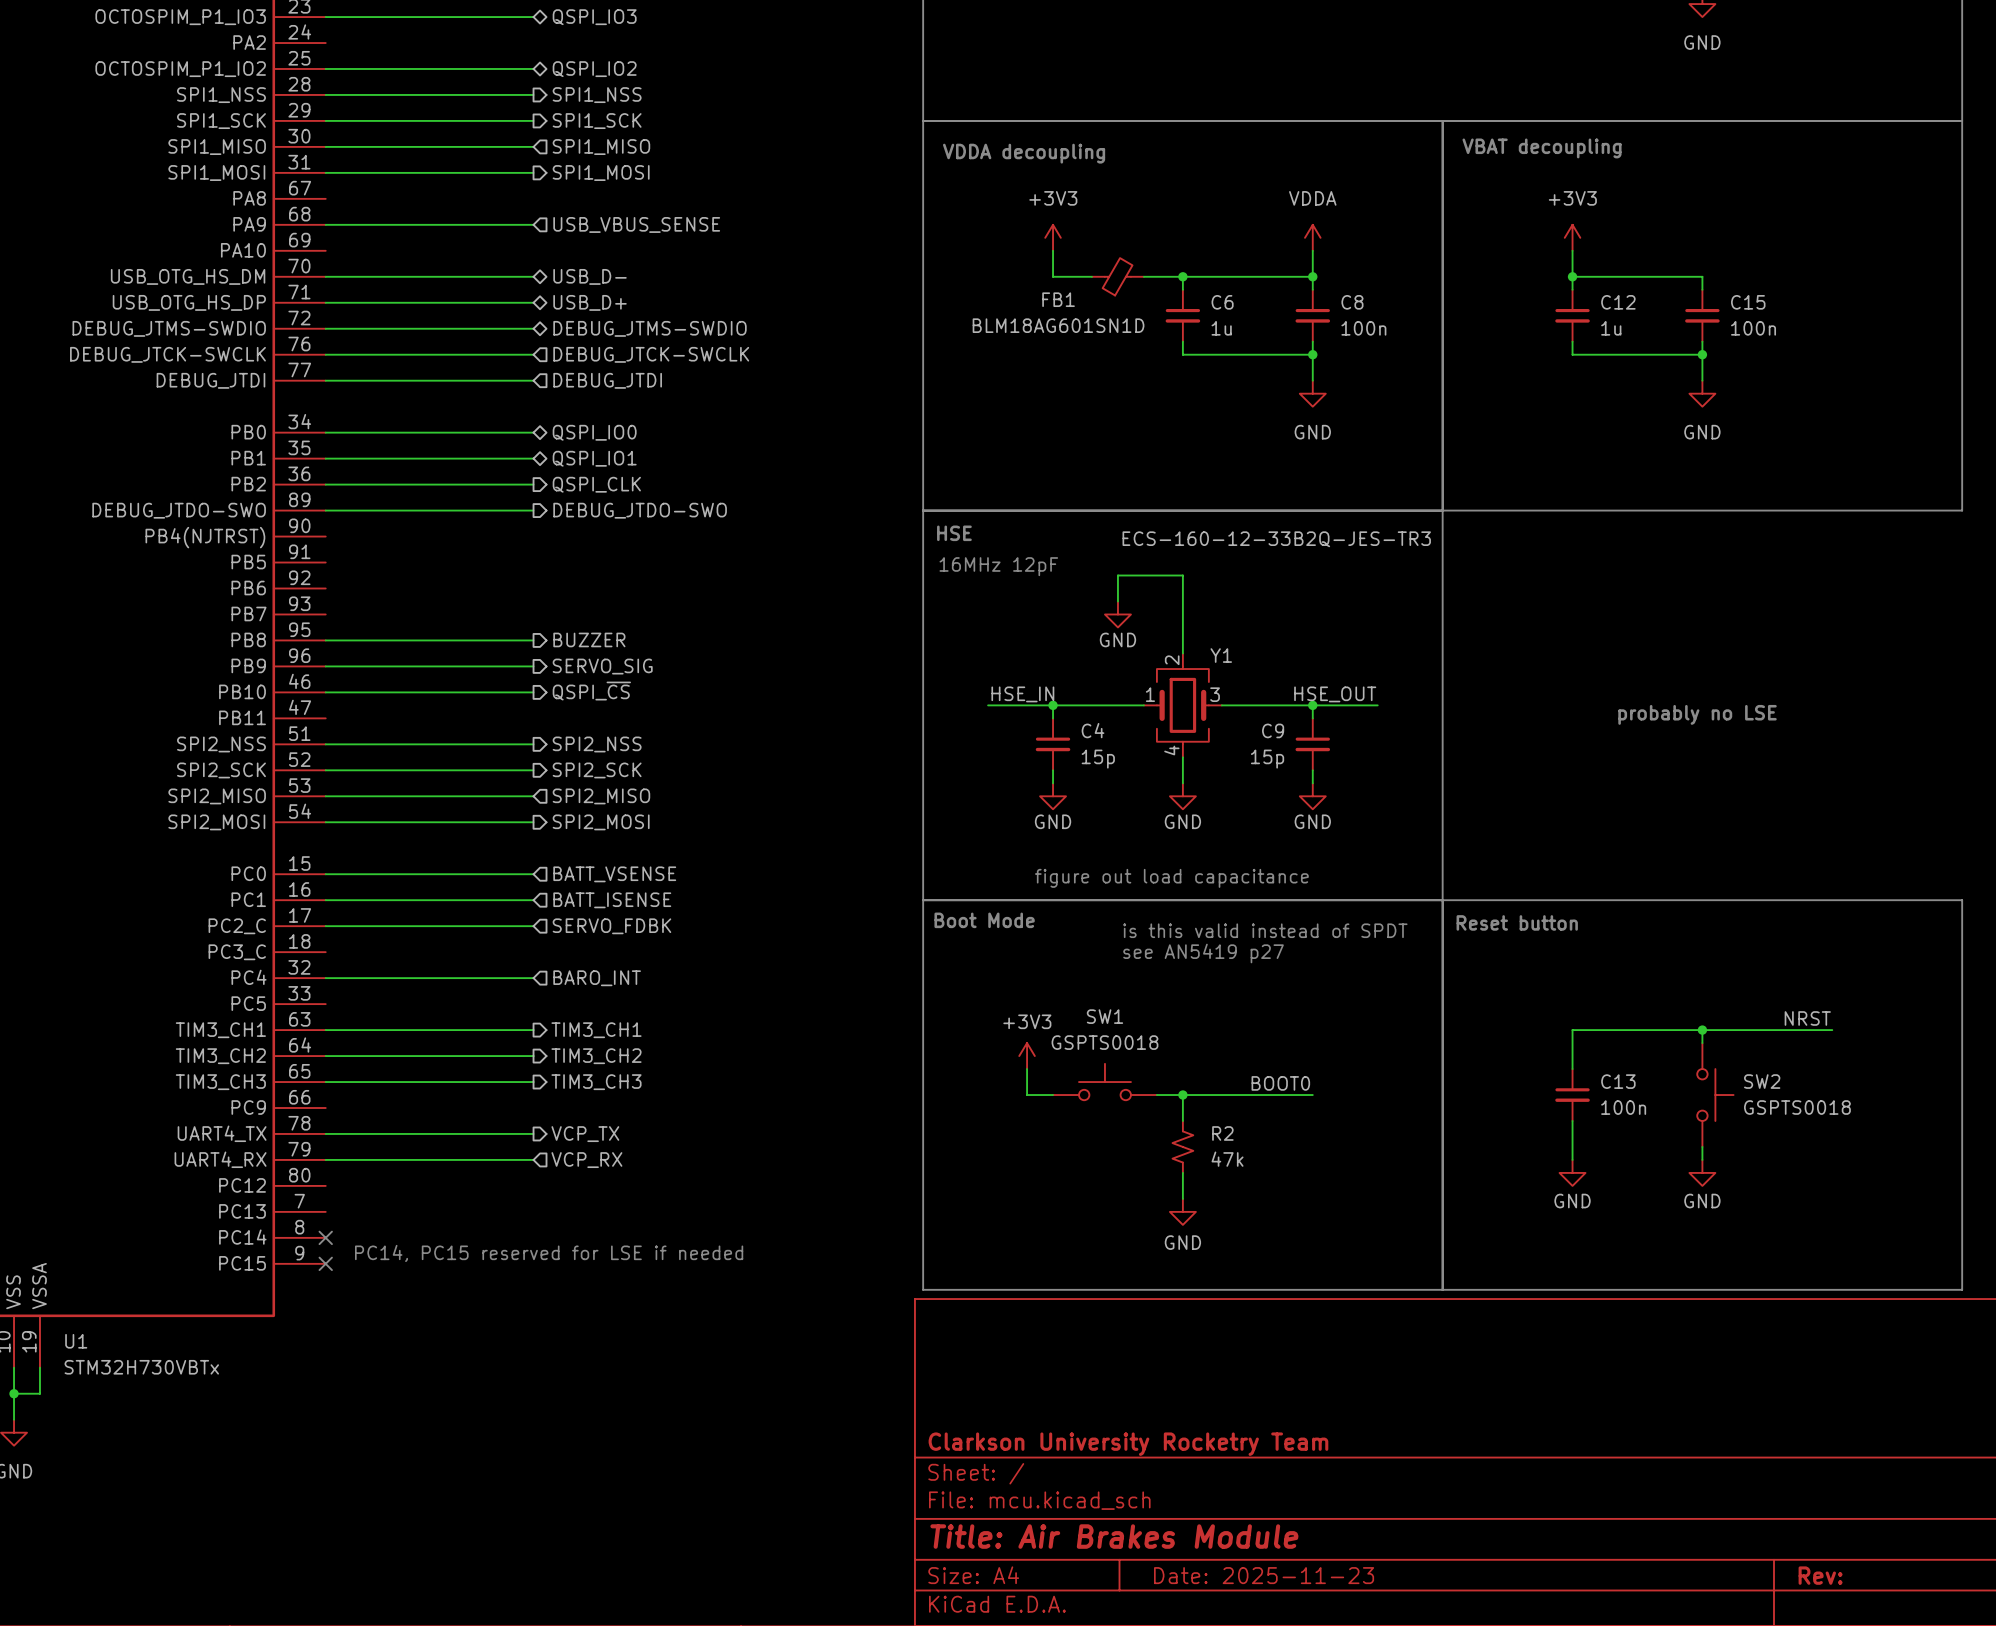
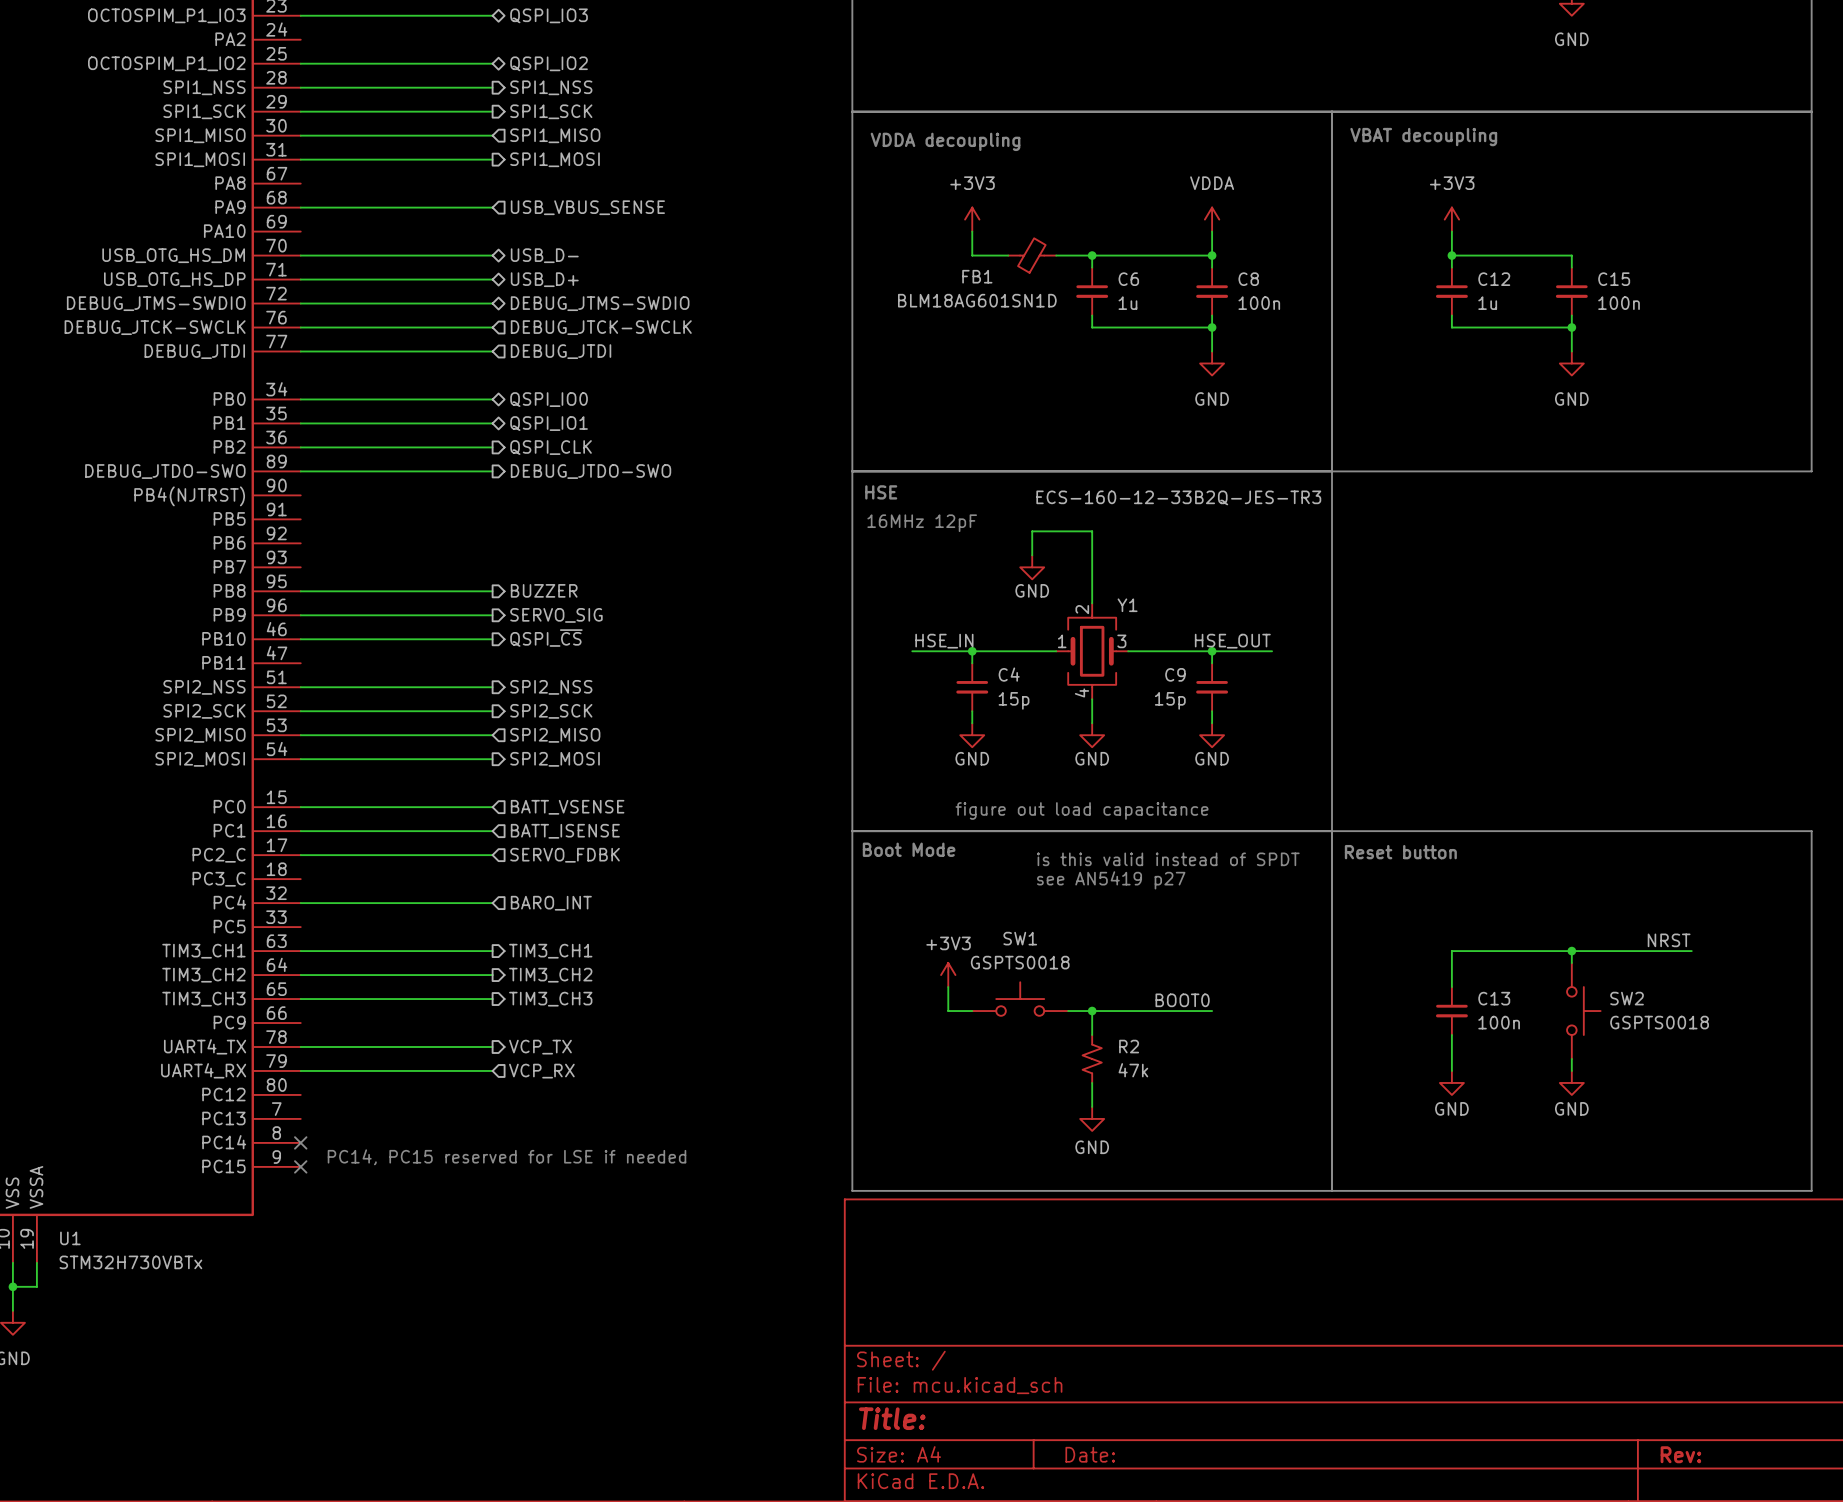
text: probably no LSE (1697, 714) -> none
title block: Clarkson University Rocketry Team (1128, 1444) -> none
title block: Title: Air Brakes Module (1114, 1536) -> Title: (892, 1418)
title block: Date: 2025-11-23 (1264, 1575) -> Date: (1090, 1454)

